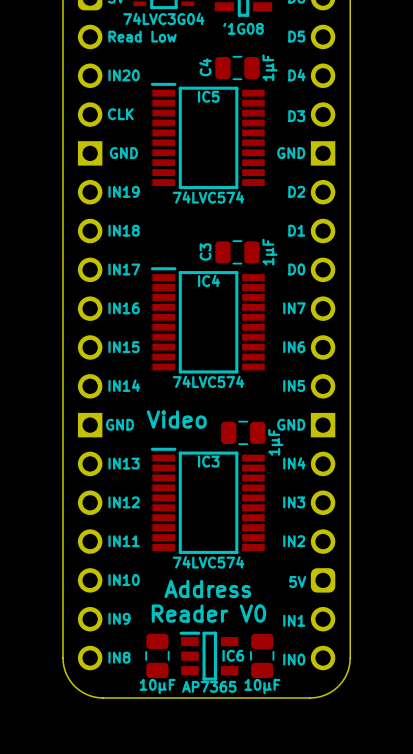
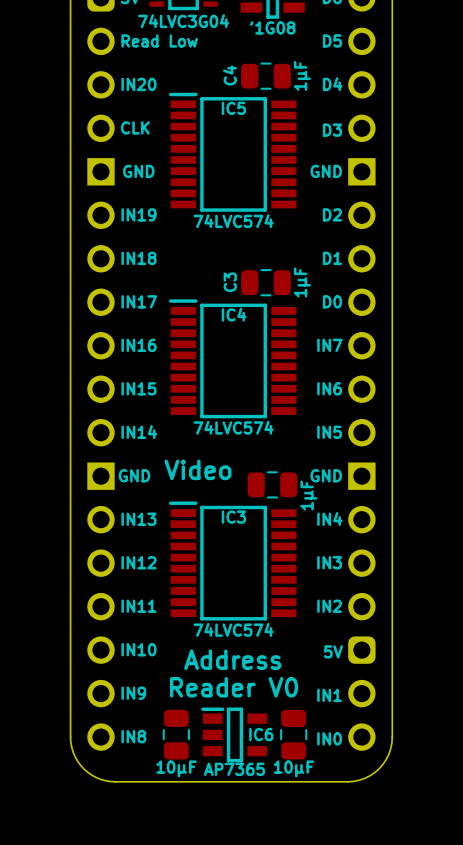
part text: none -> '1G08 (272, 27)
part text: '1G08 (243, 28) -> none

